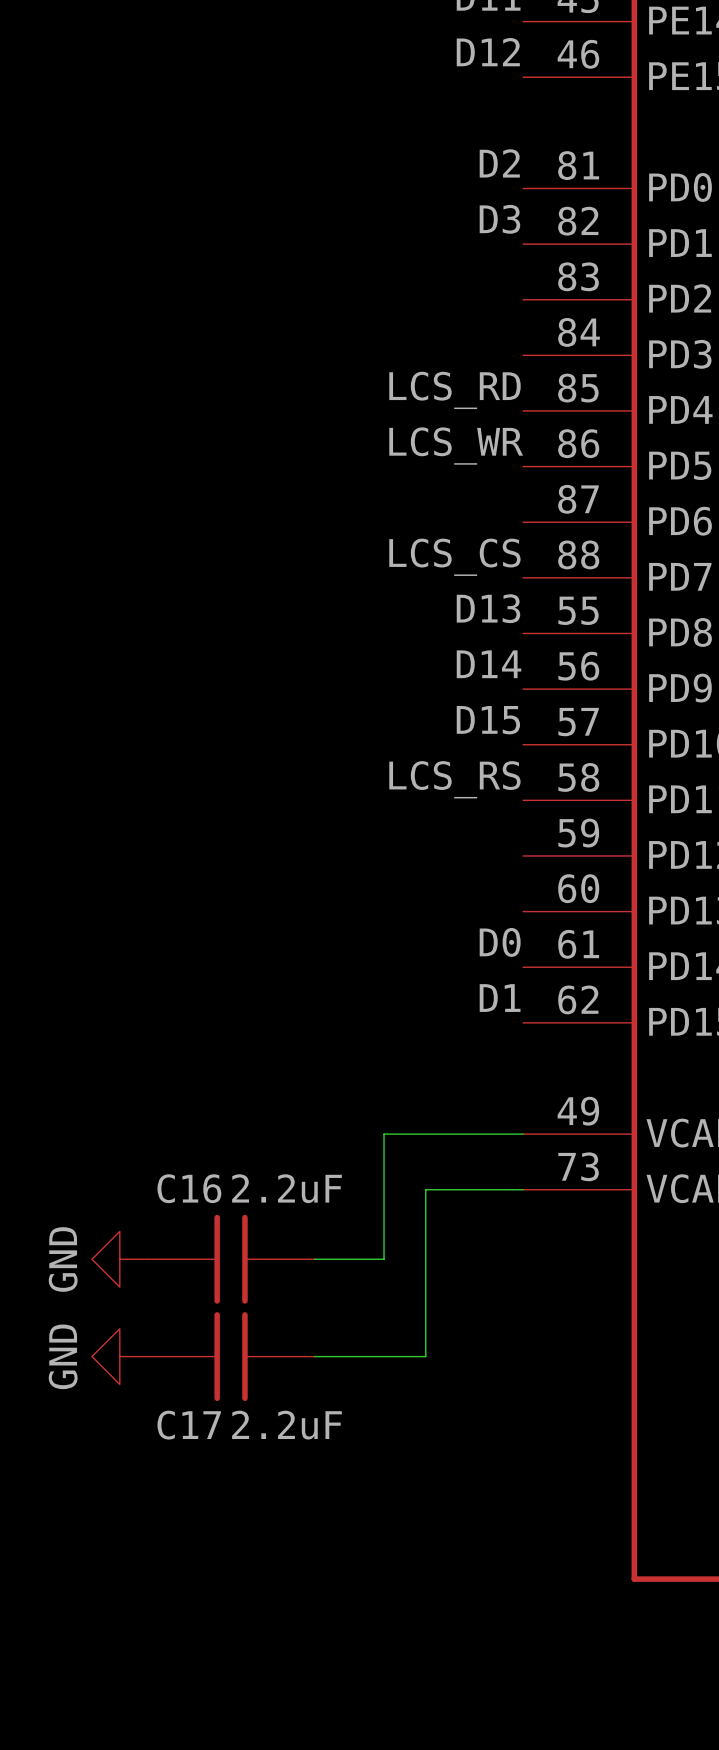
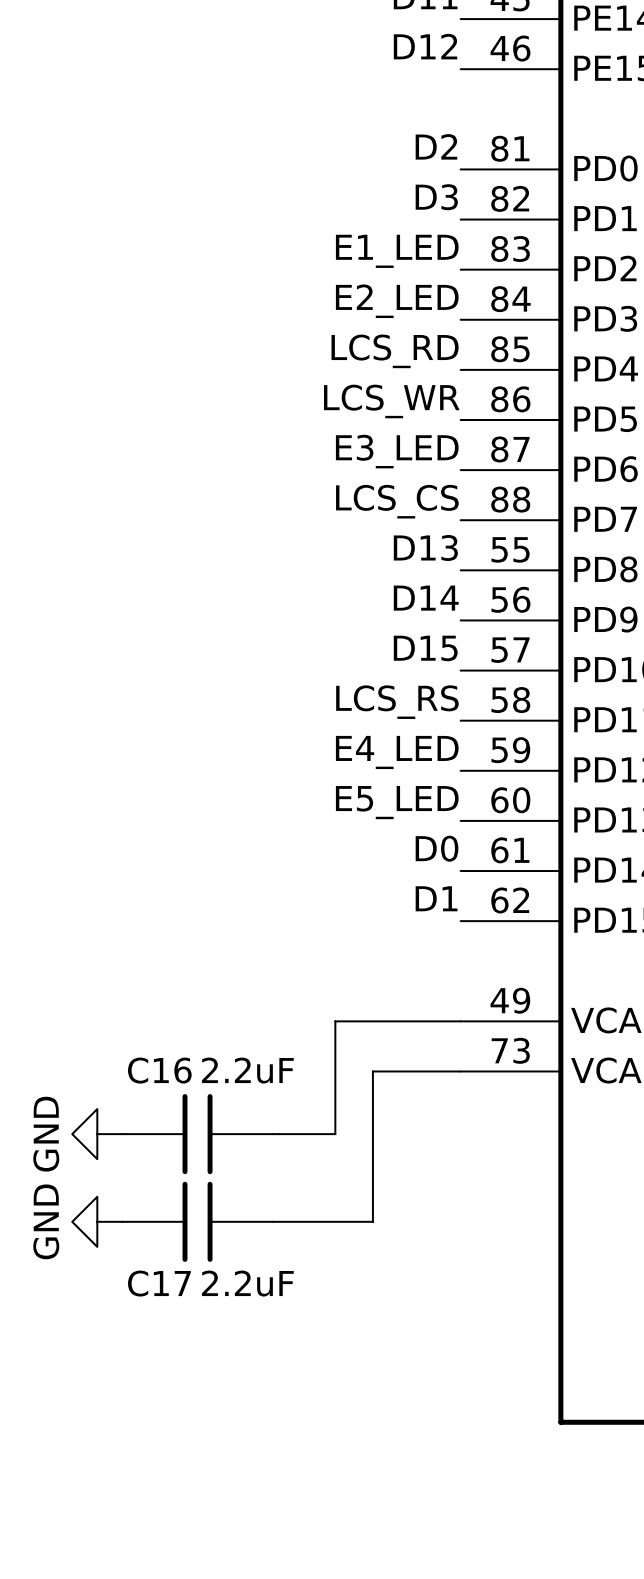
label: none -> E1_LED (397, 251)
label: none -> E2_LED (397, 301)
label: none -> E3_LED (397, 451)
label: none -> E4_LED (397, 752)
label: none -> E5_LED (397, 802)

